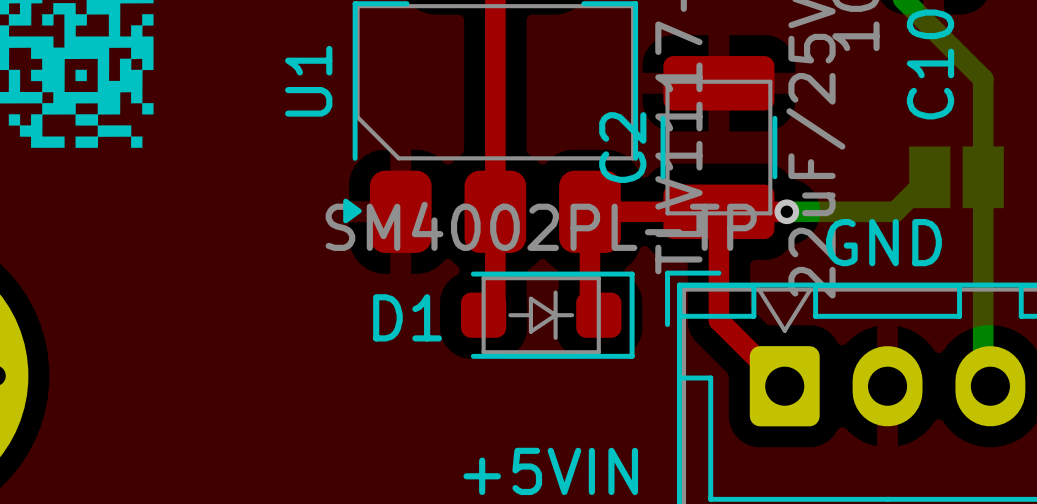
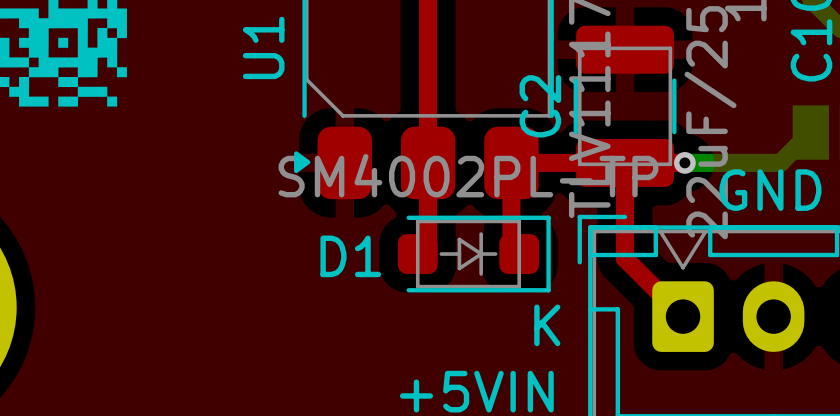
text: none -> K (547, 325)

